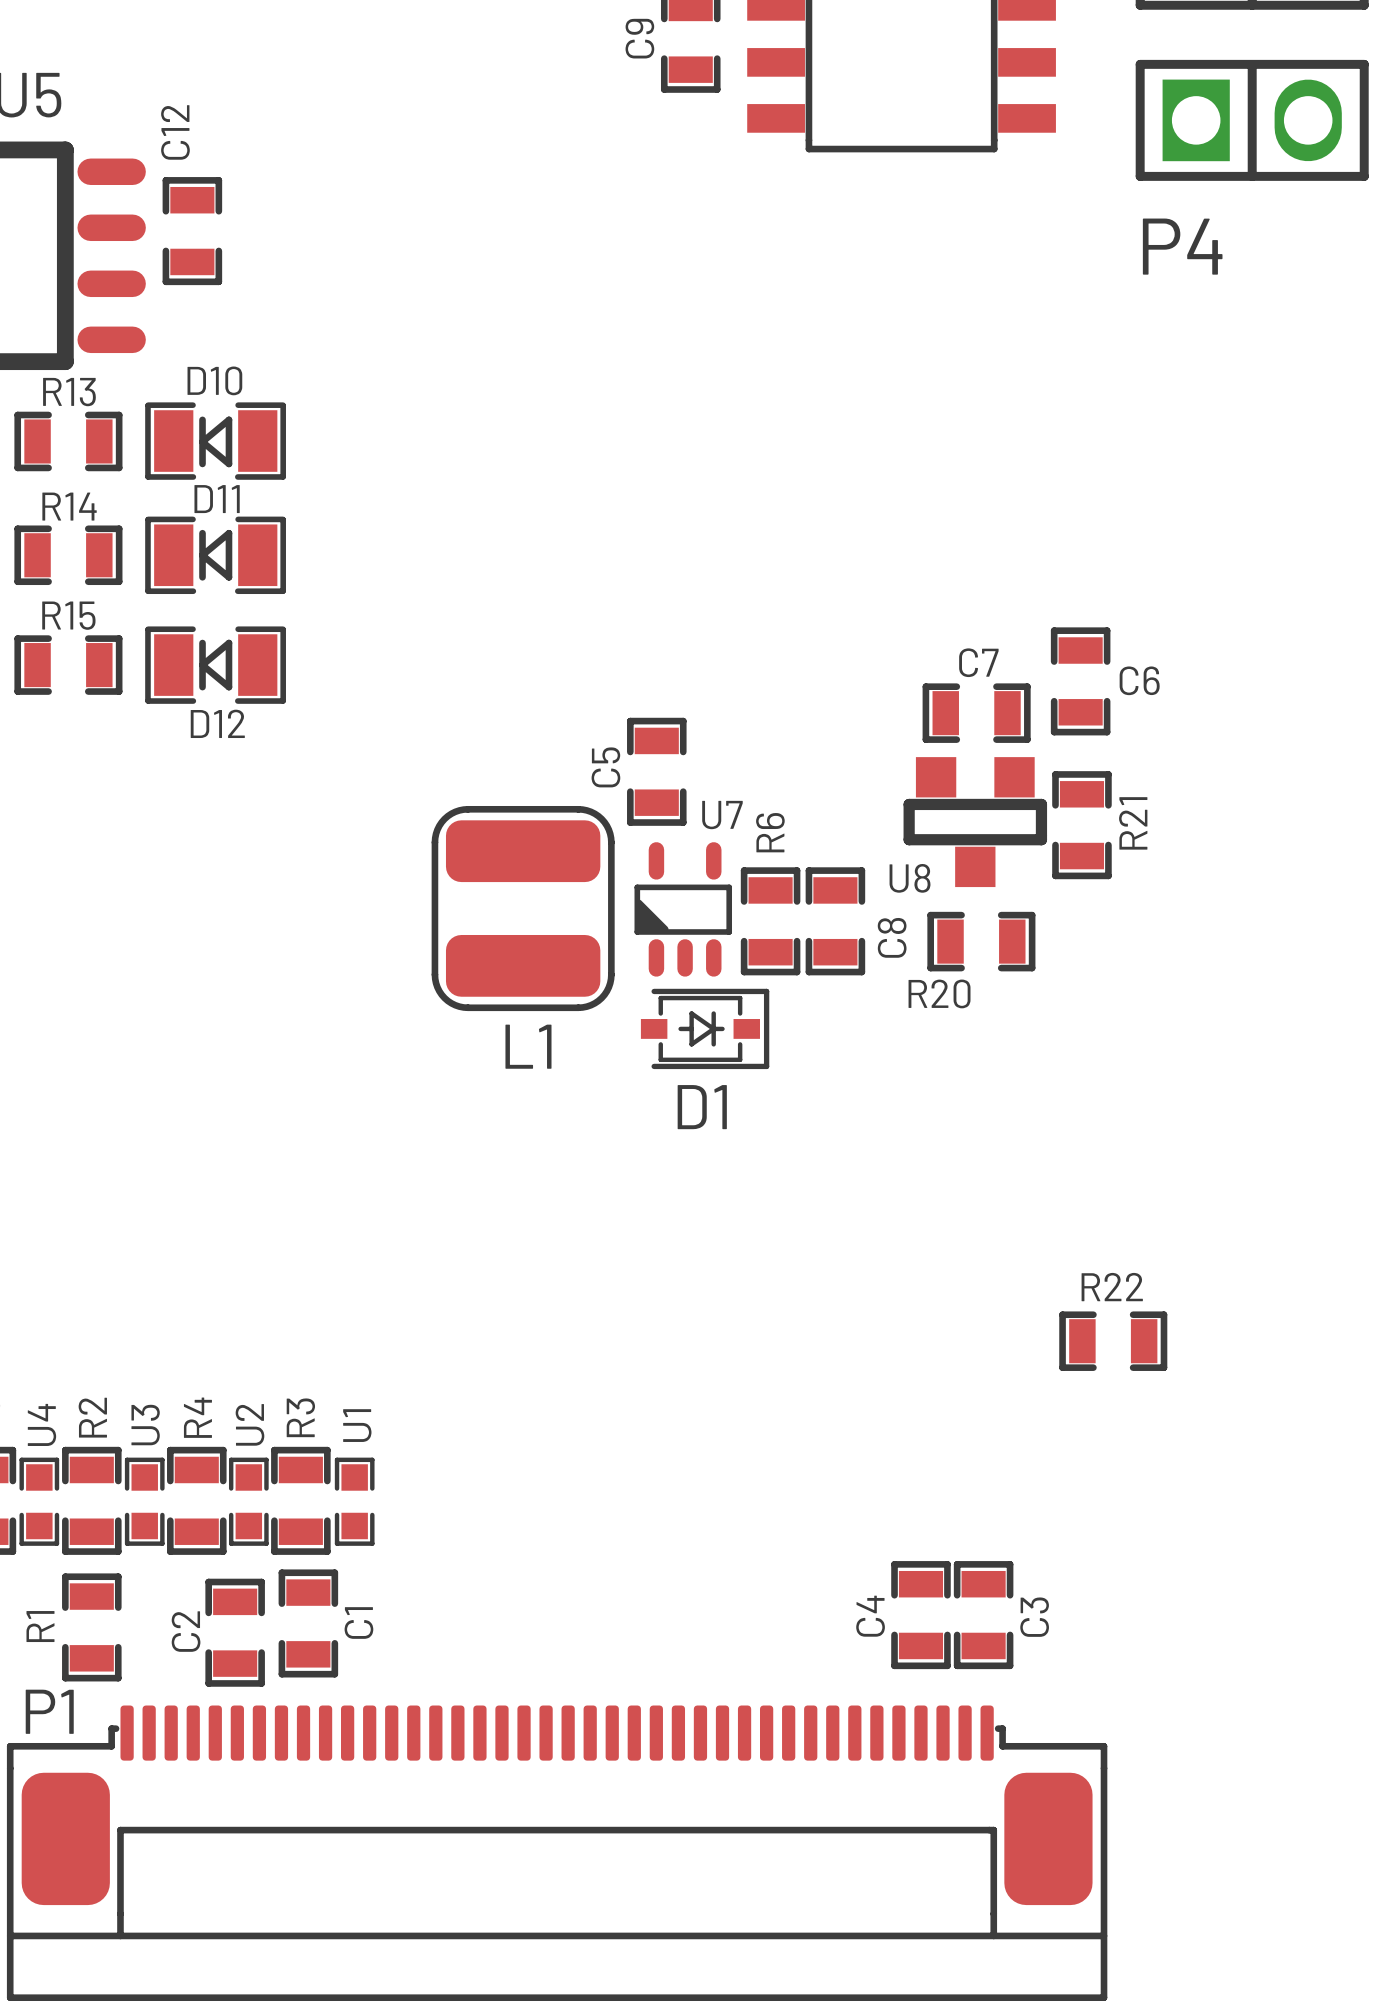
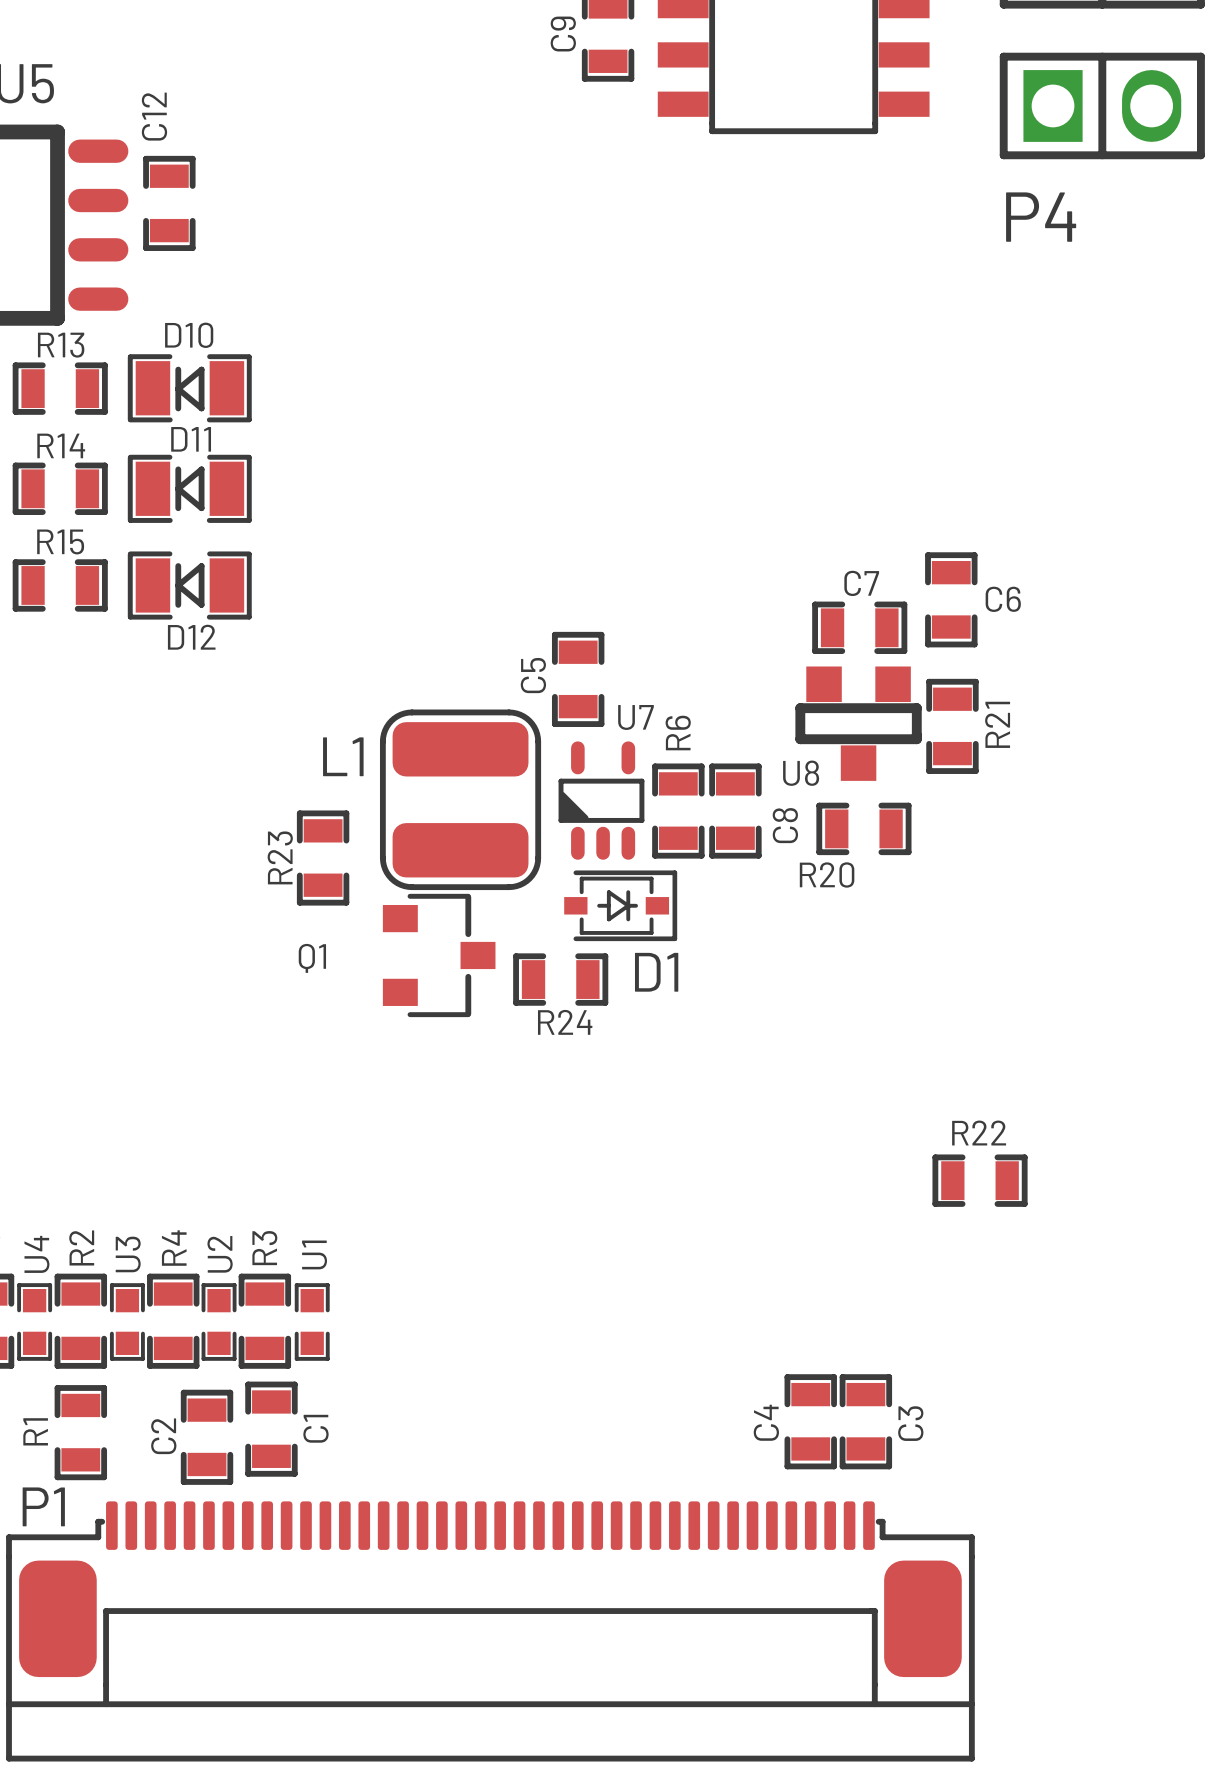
R23: none -> (323, 858)
L1 name position: L1 (528, 1046) -> L1 (343, 756)
Q1: none -> (439, 955)
D1 name position: D1 (702, 1107) -> D1 (656, 972)
R24: none -> (560, 979)

